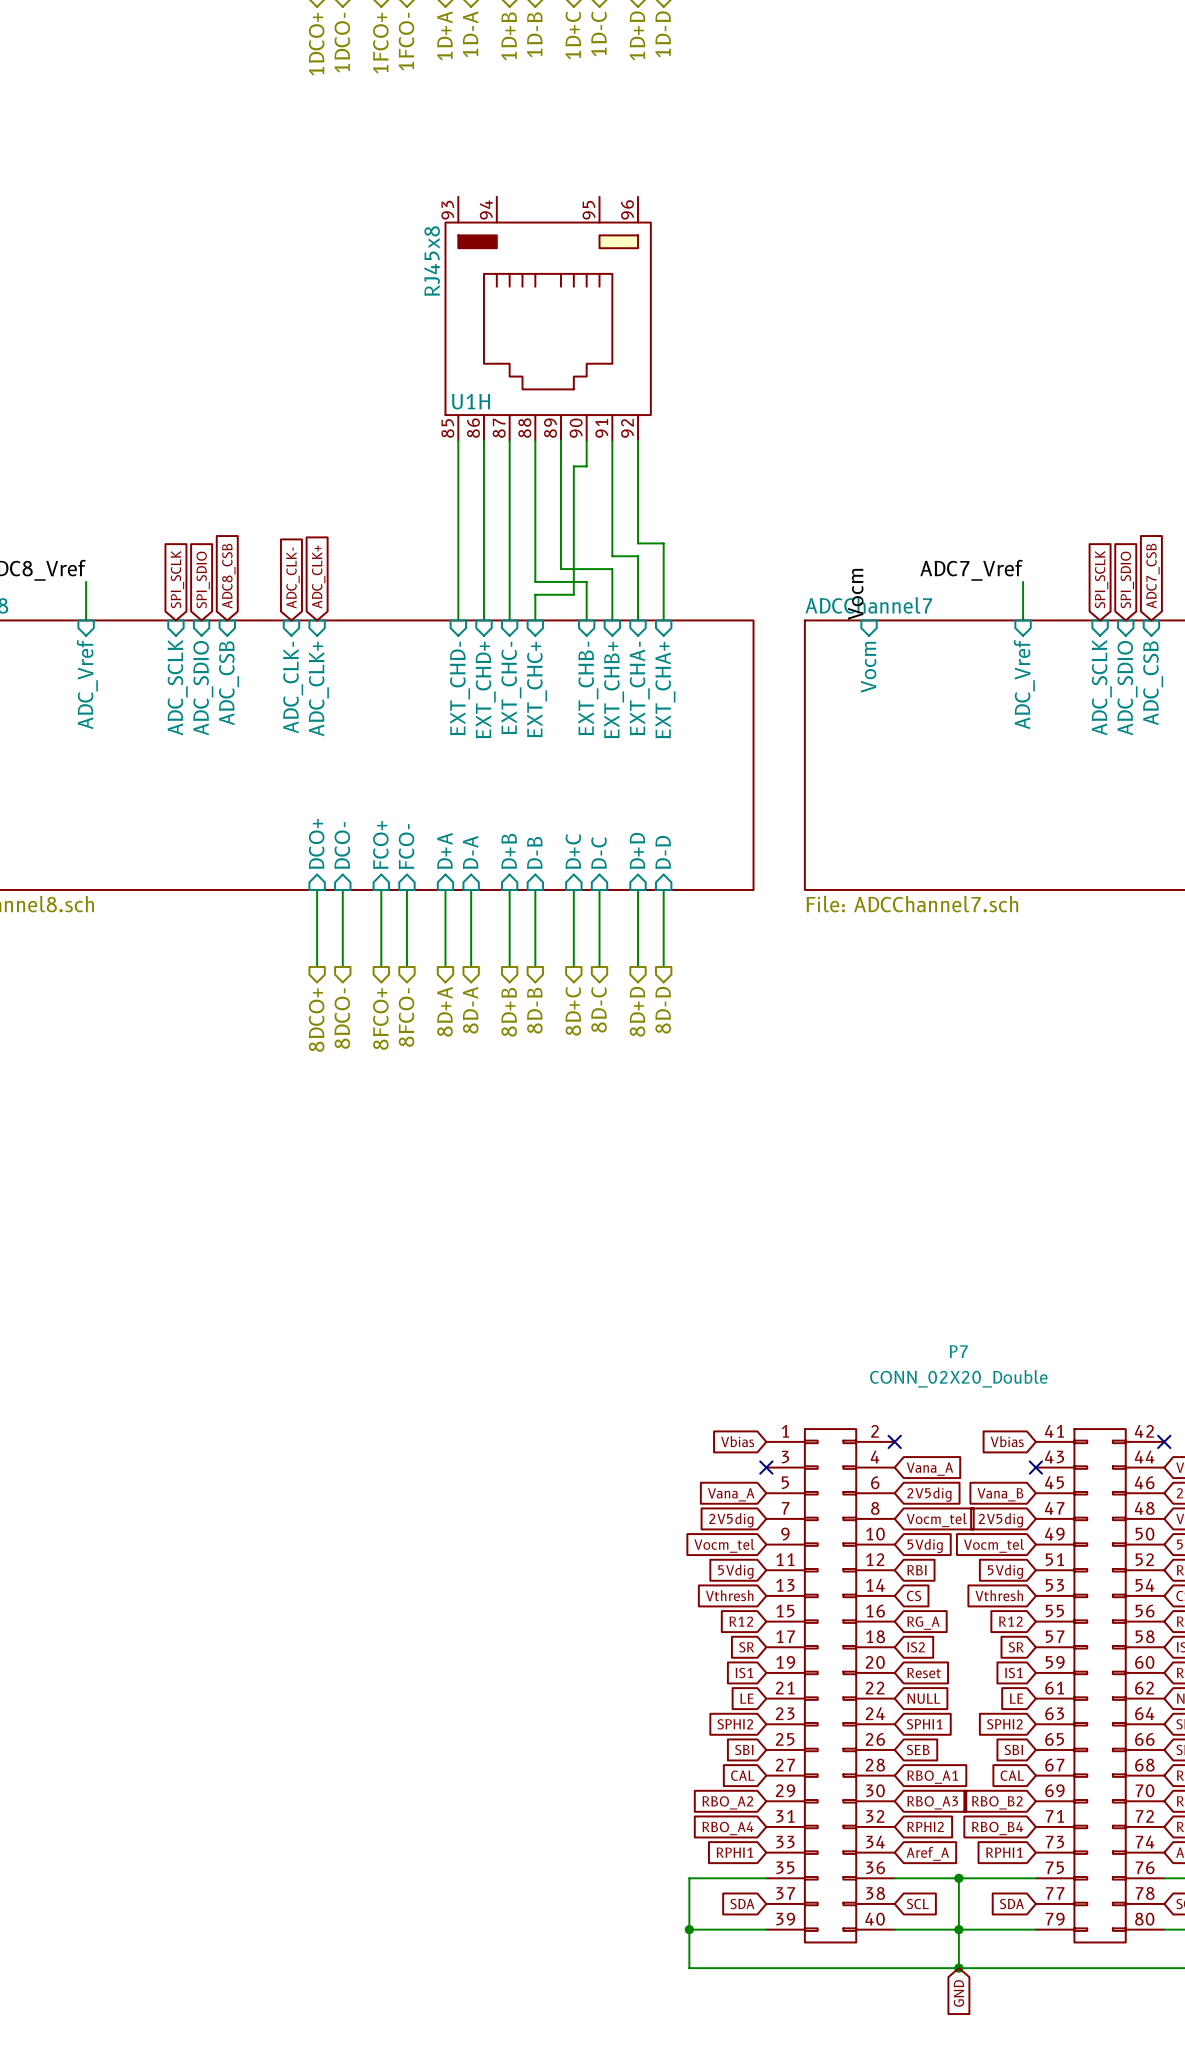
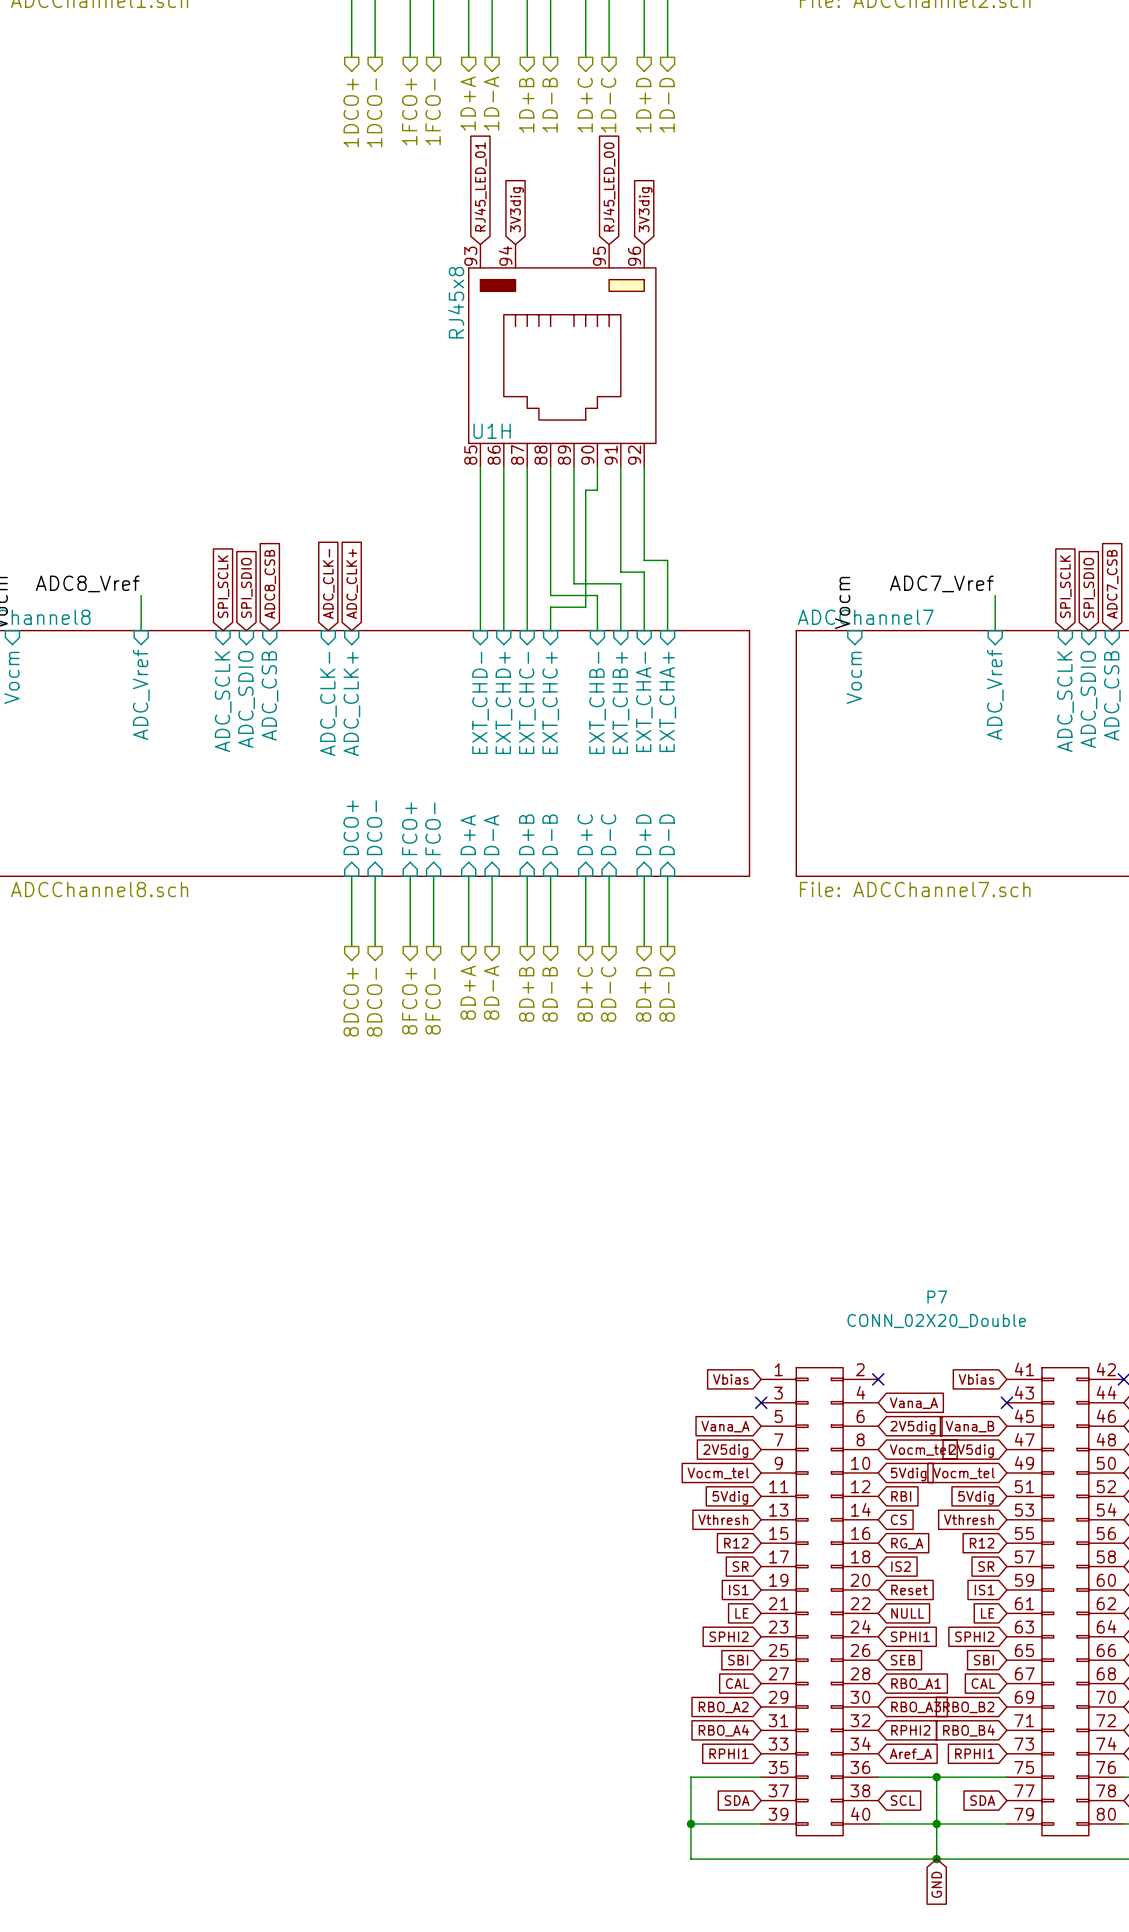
global label: none -> RJ45_LED_00 (609, 186)
global label: none -> RJ45_LED_01 (480, 186)
global label: none -> 3V3dig (517, 209)
global label: none -> 3V3dig (645, 209)

